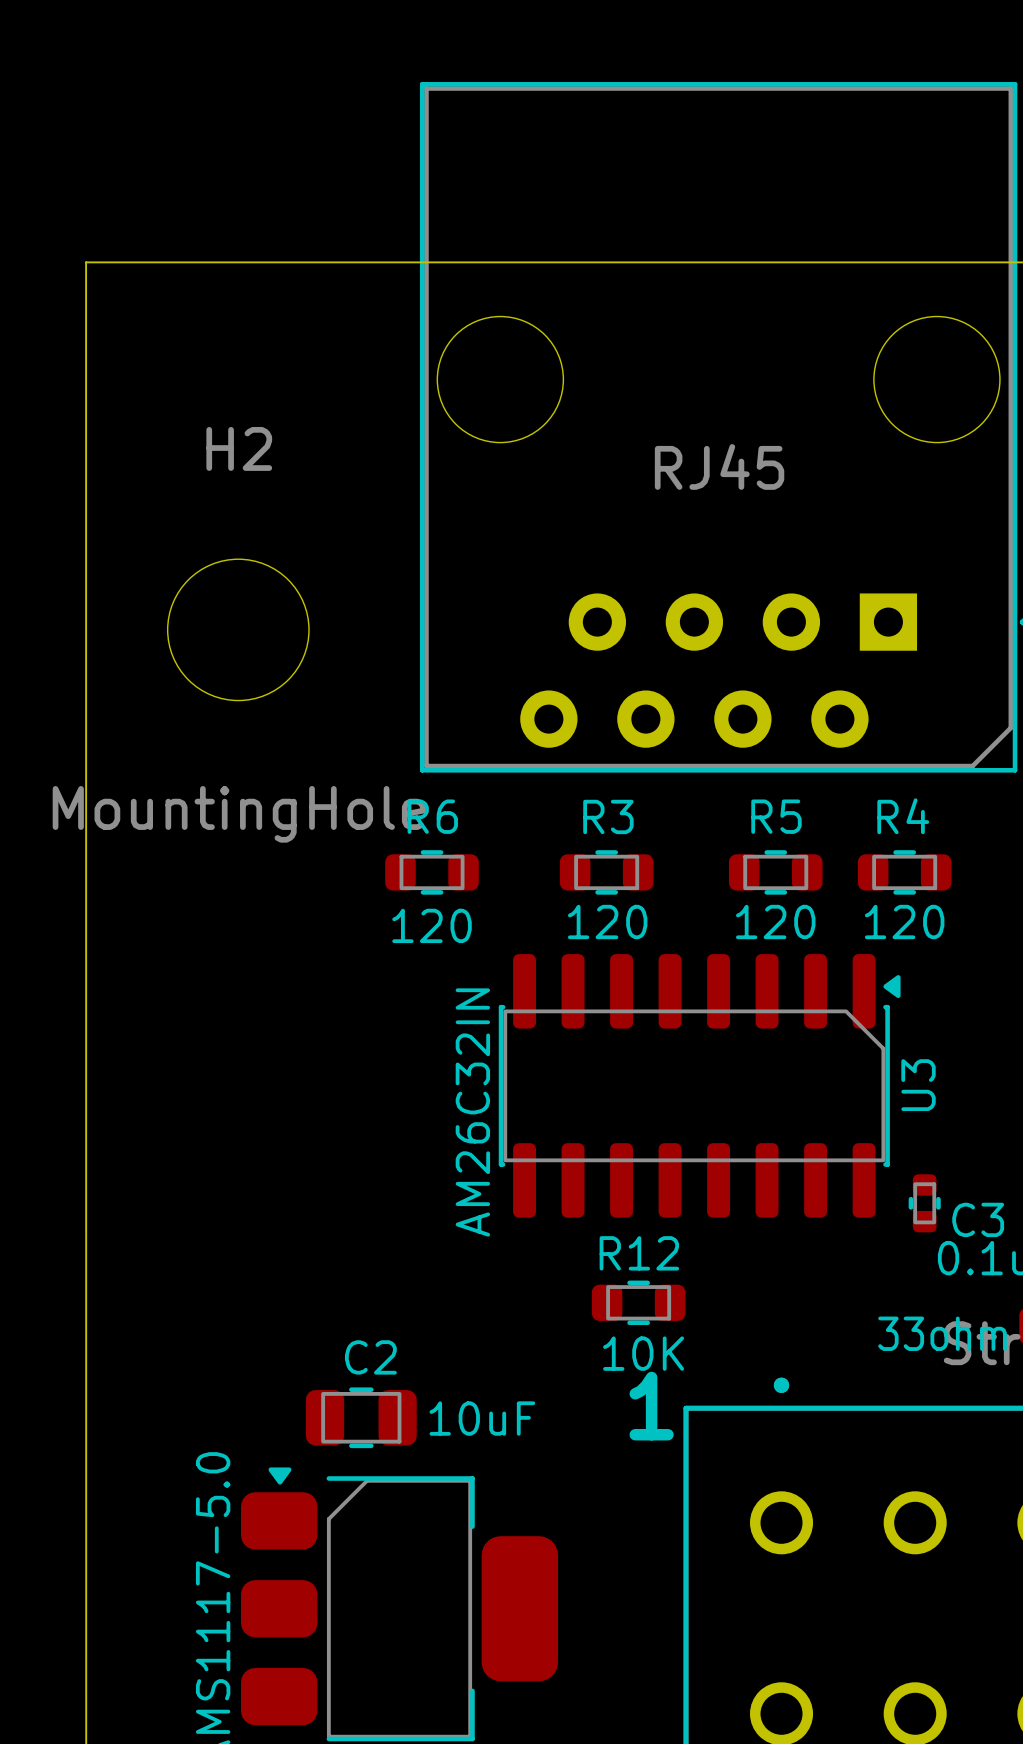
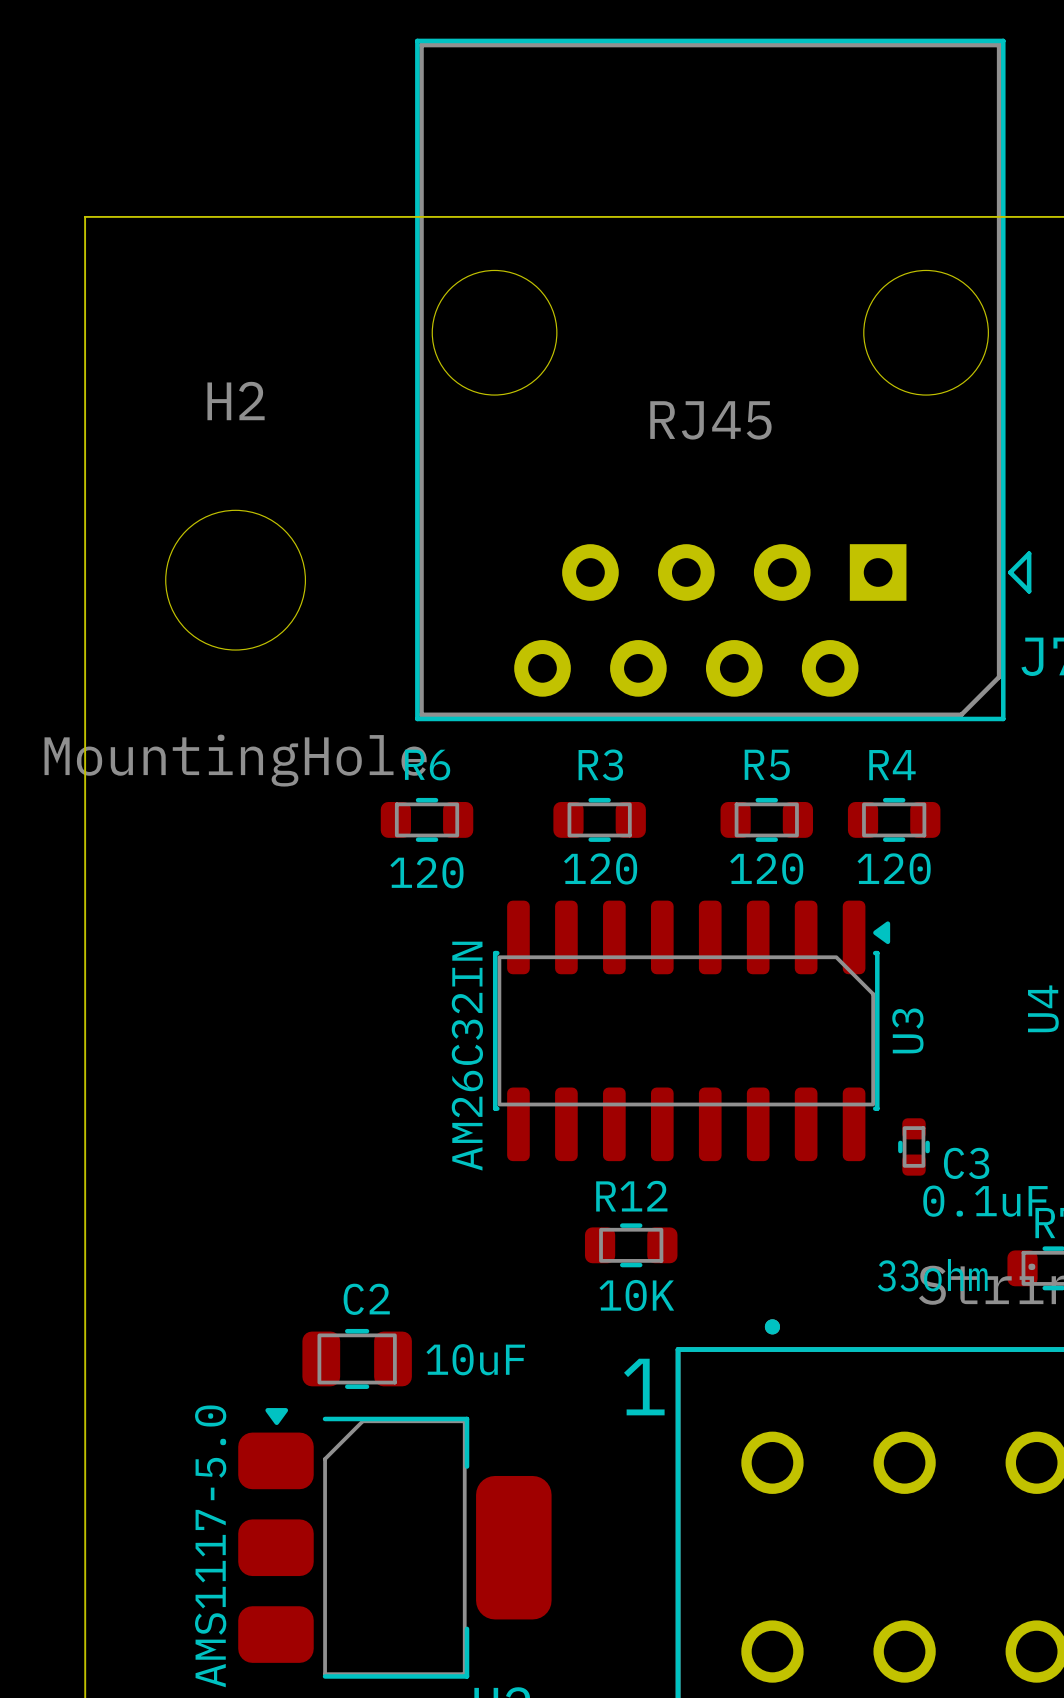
text position: 1 (651, 1406) -> 1 (644, 1387)

